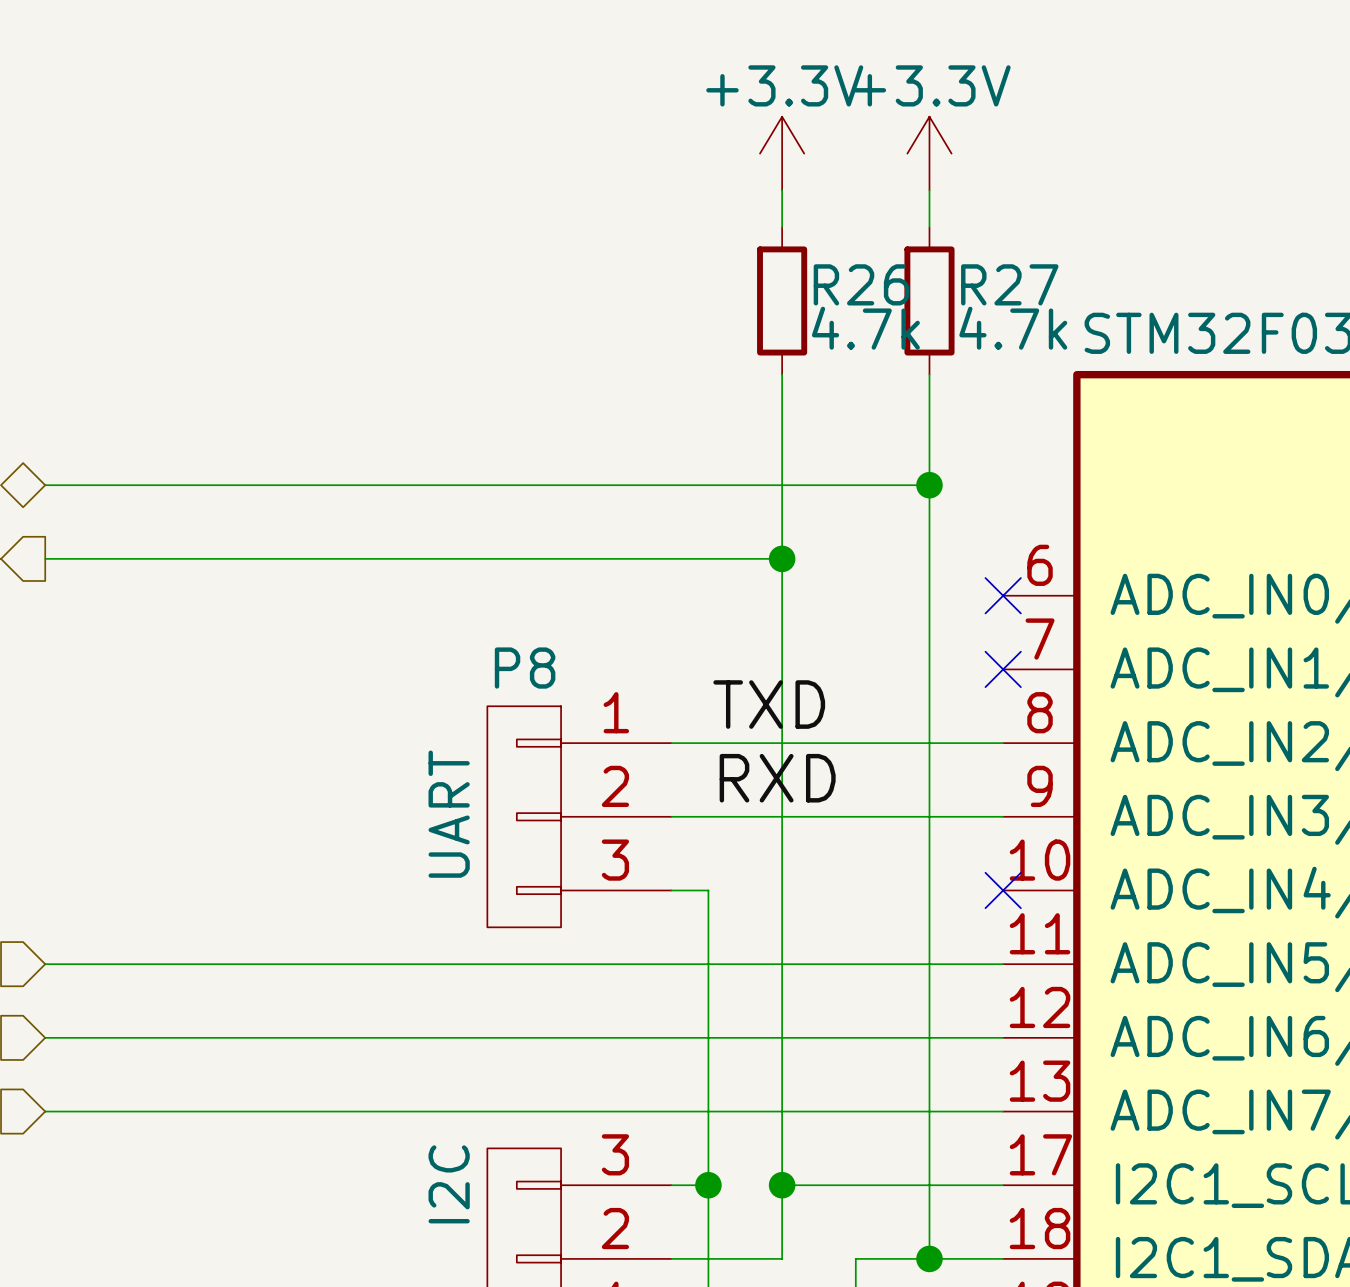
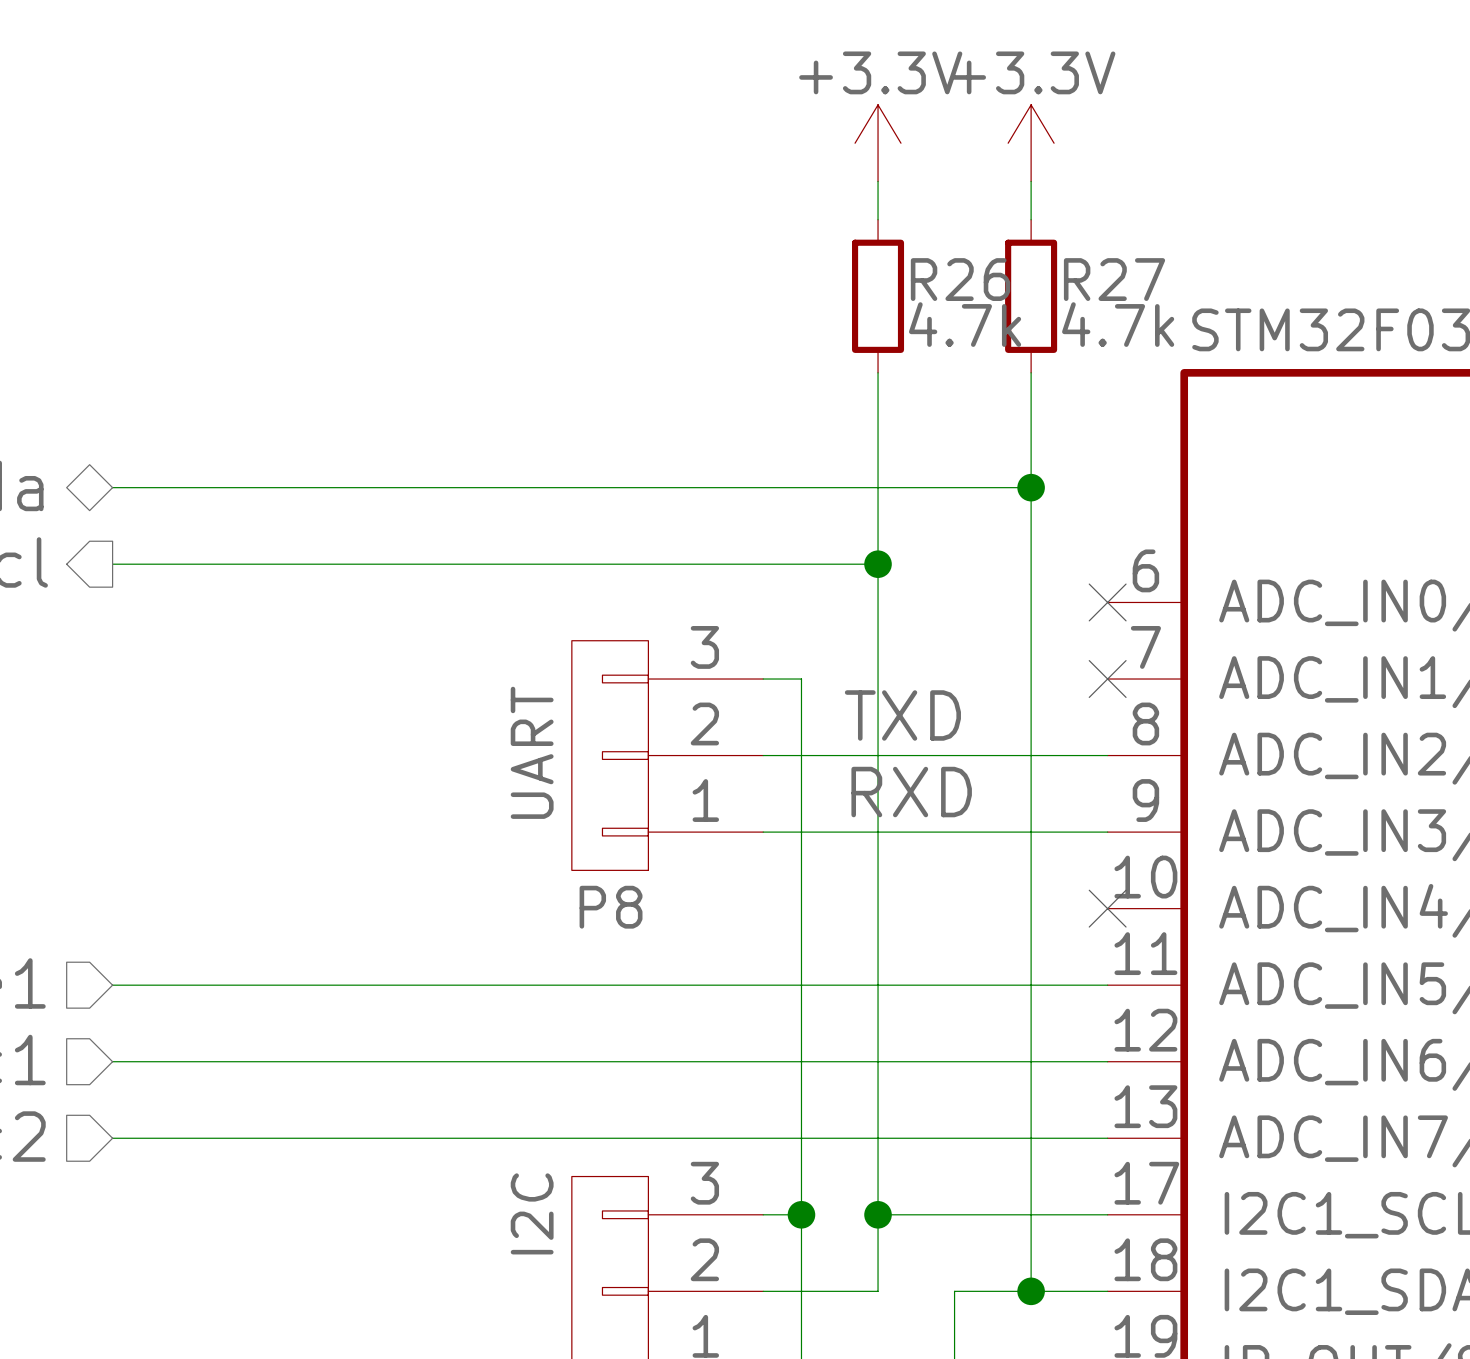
label position: TXD (769, 704) -> TXD (902, 715)
label position: RXD (777, 778) -> RXD (911, 792)
P8 flip: as is (524, 816) -> up-down (610, 755)
wire: (671, 890) (708, 890) -> (763, 679) (801, 679) (801, 908)

